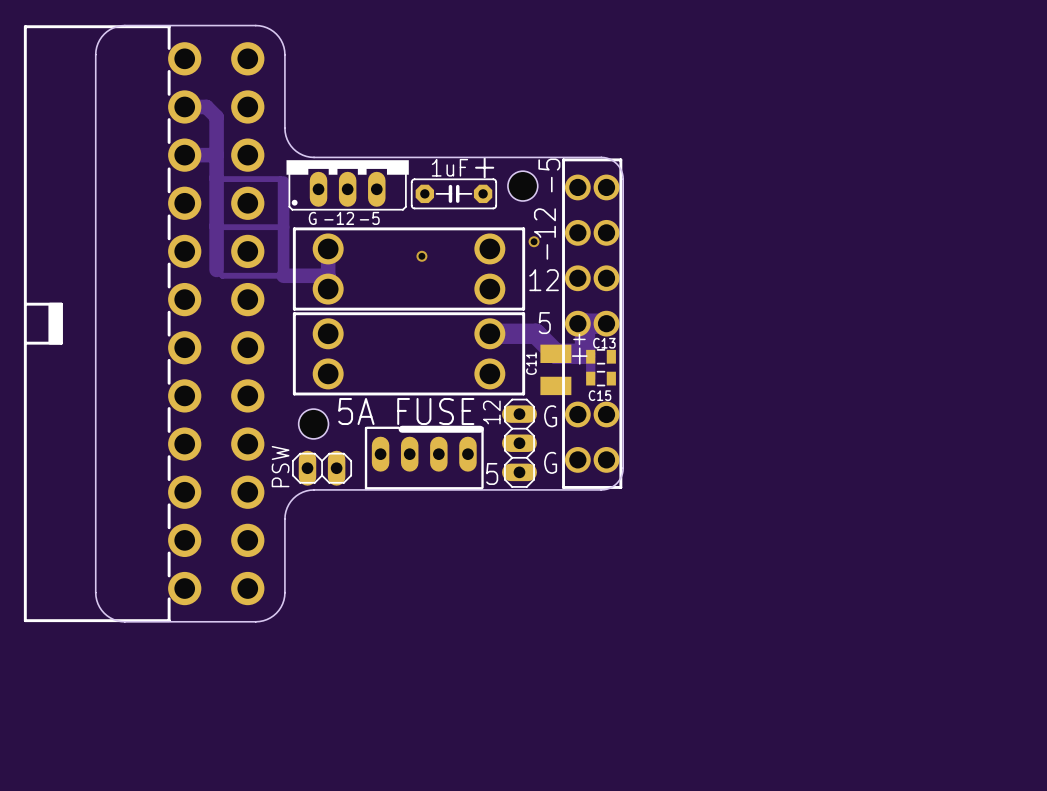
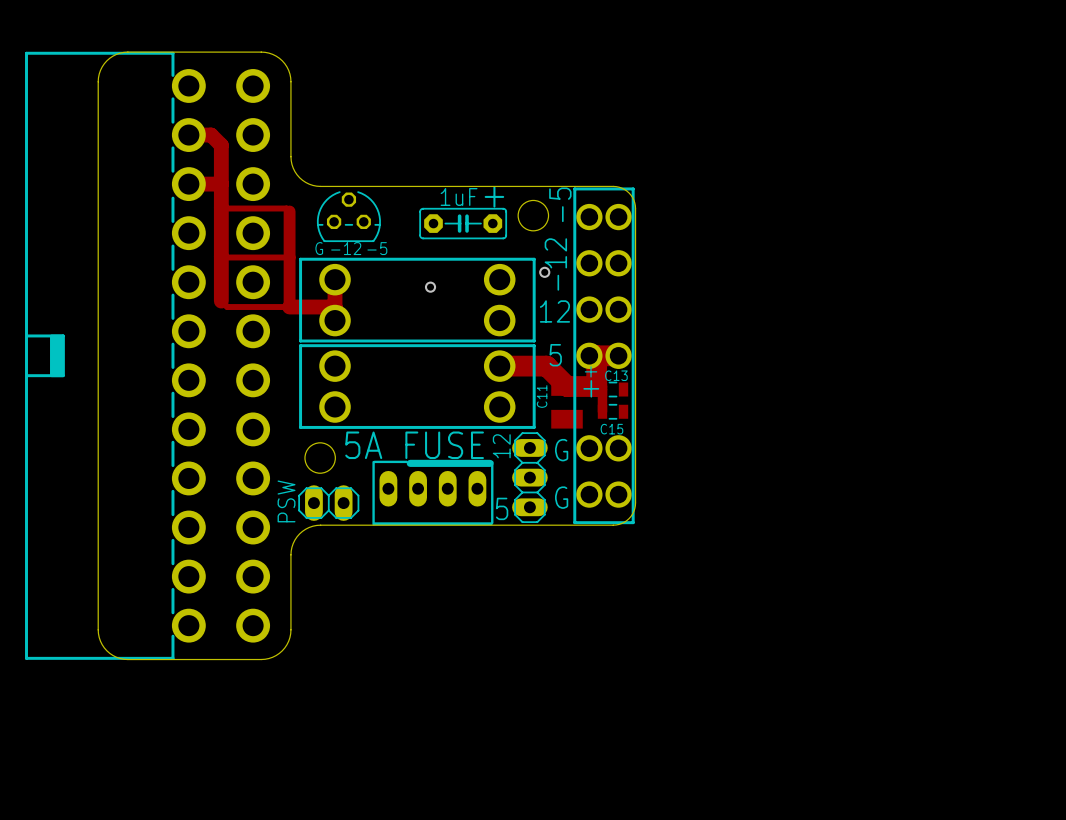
part footprint: [286, 160, 409, 211] -> [316, 191, 381, 243]

